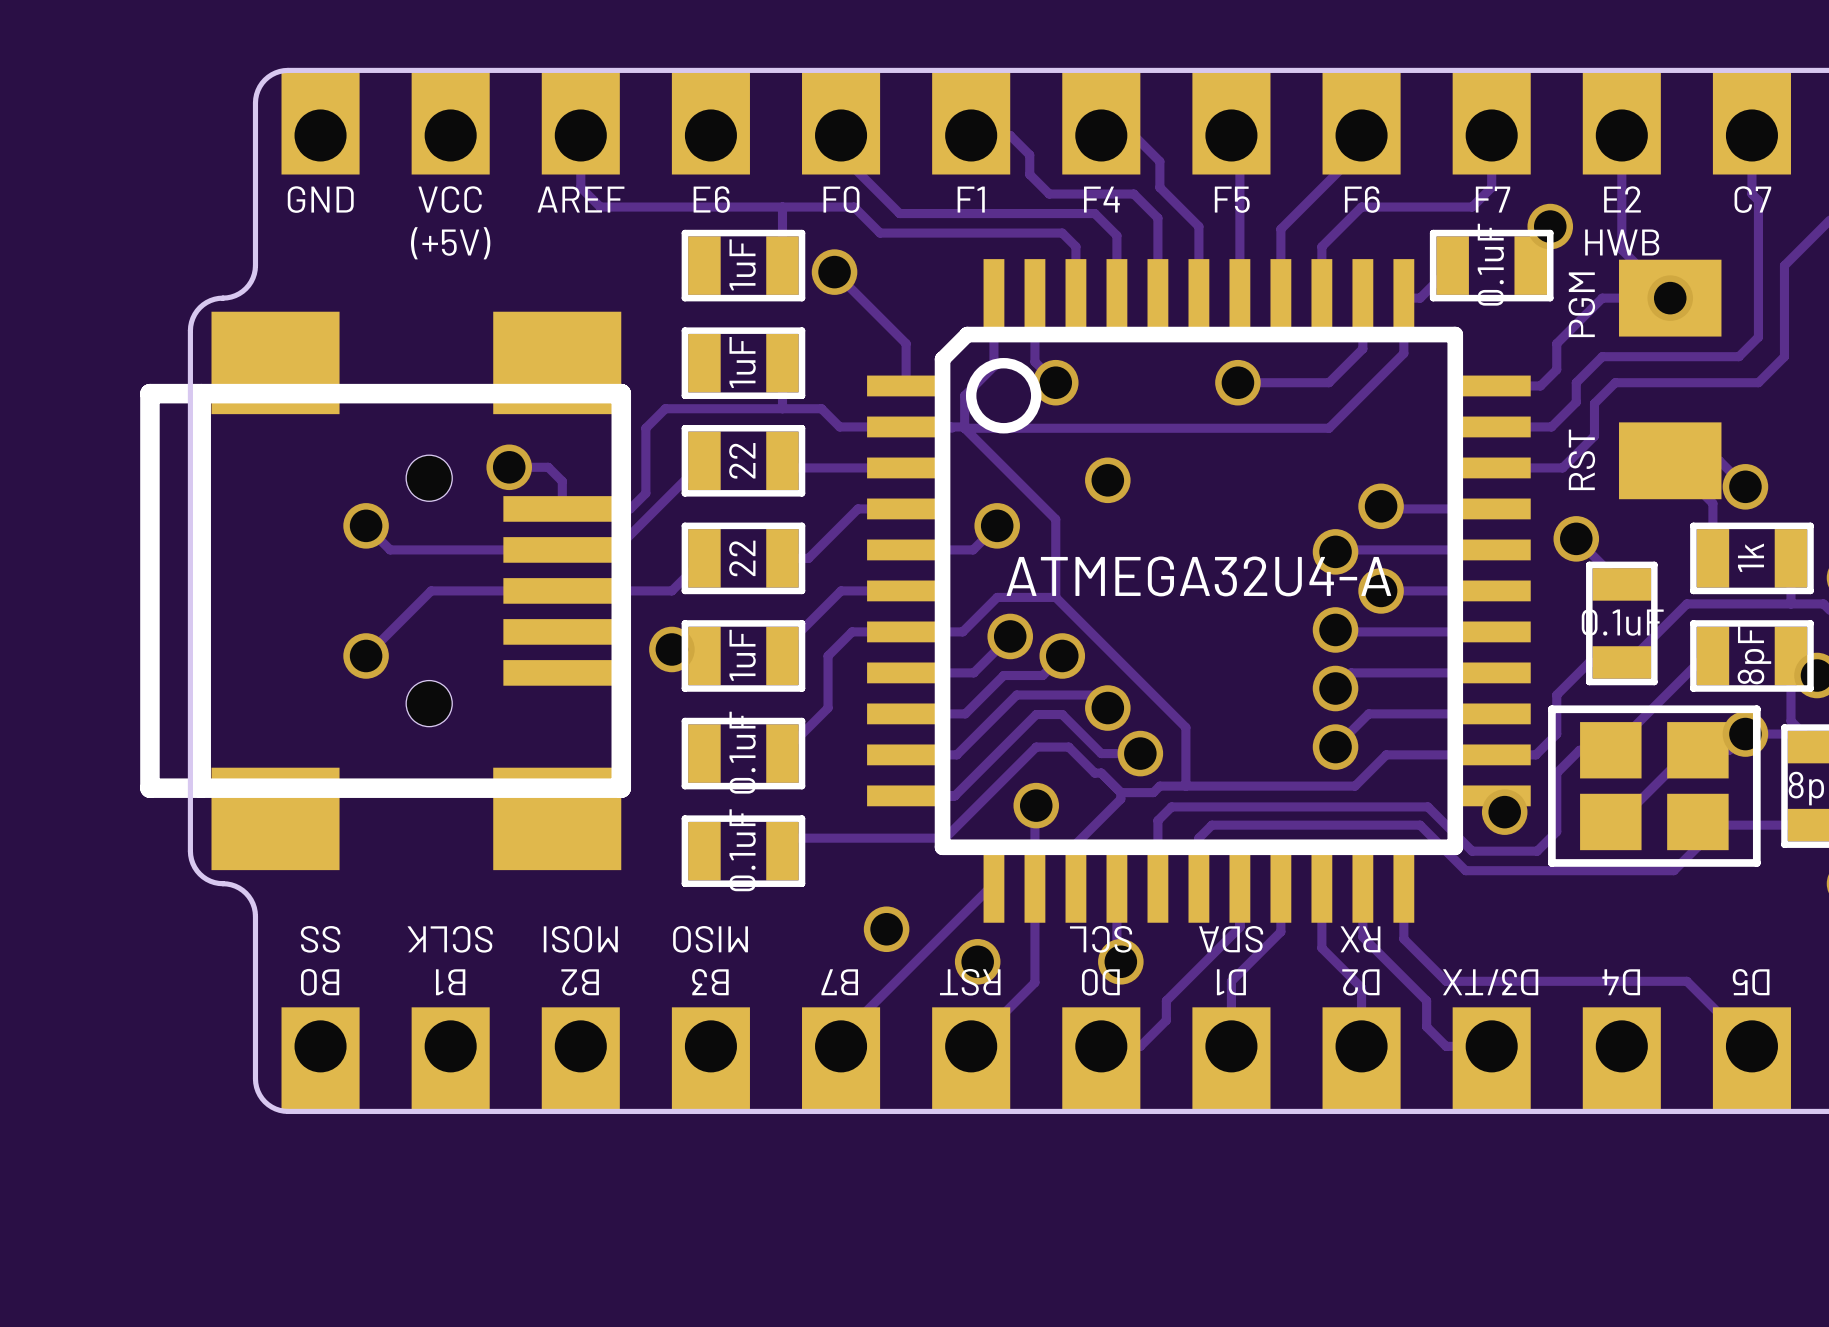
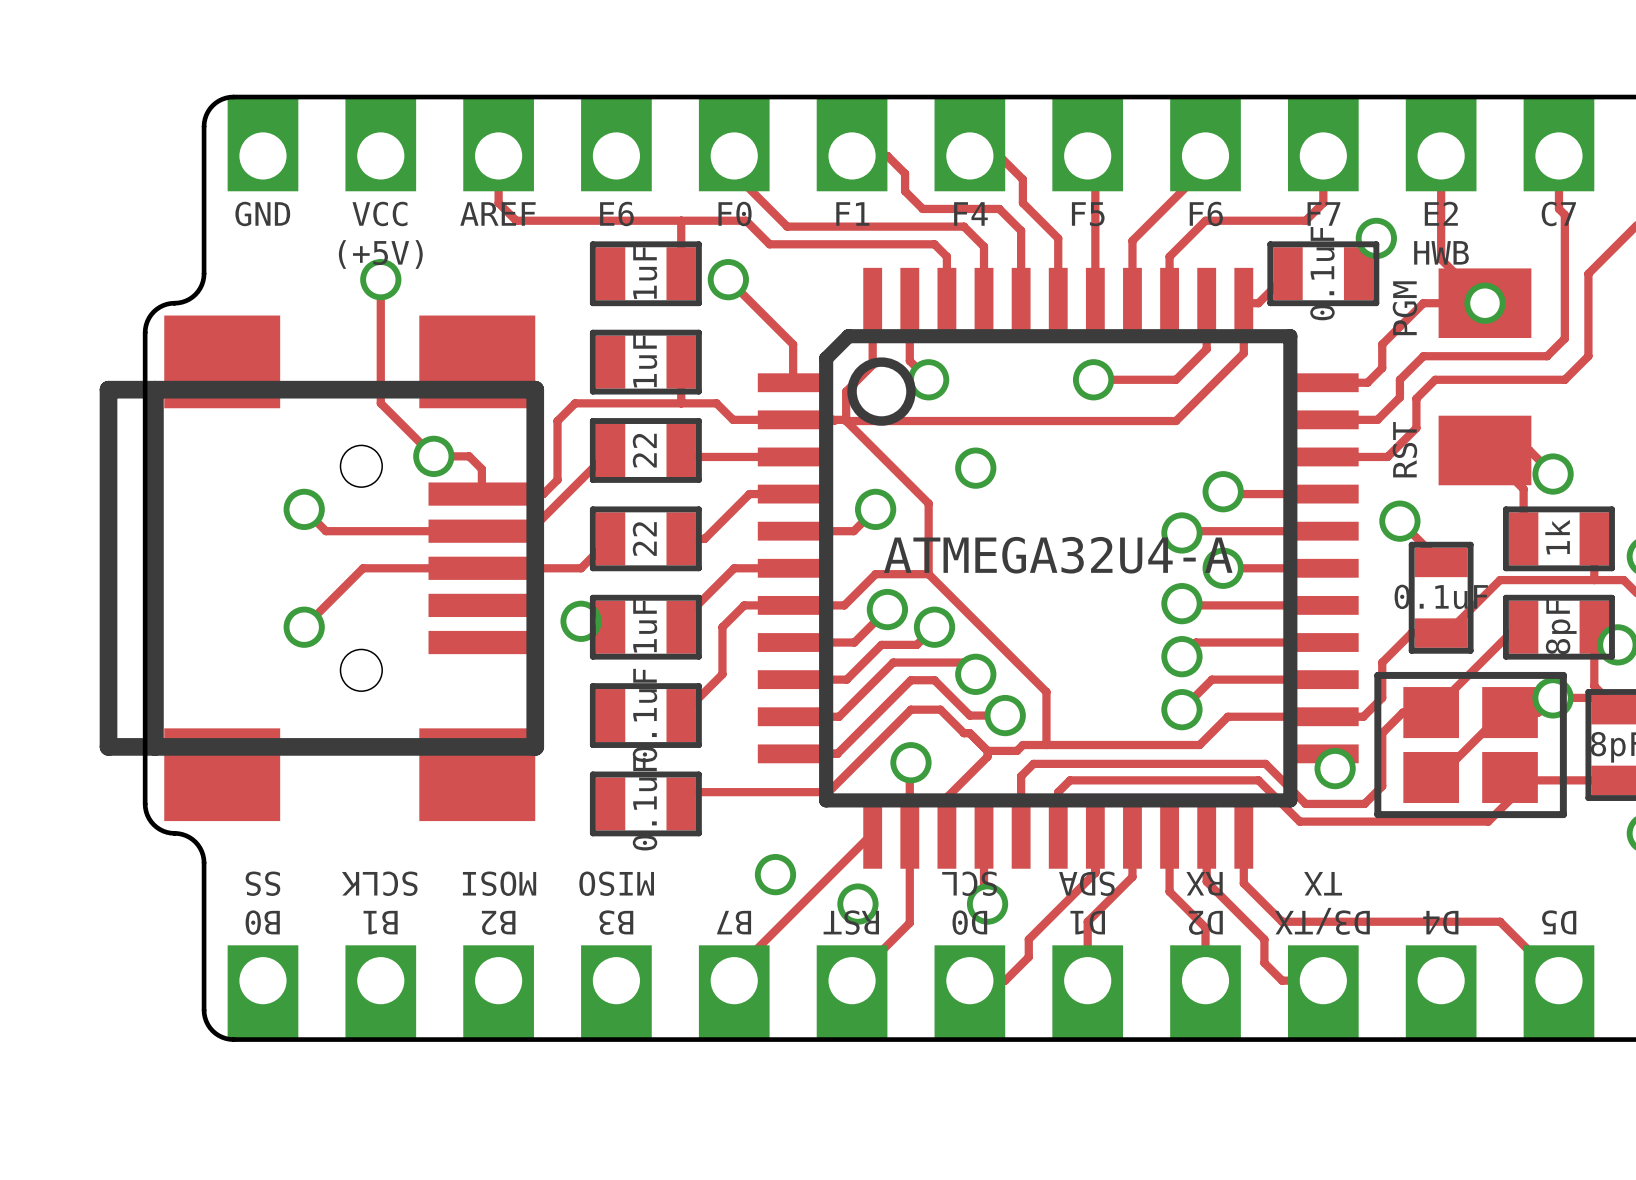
track: none -> (380, 279) (380, 403) (433, 456)
via: none -> (380, 279)
text: none -> TX (1323, 883)

